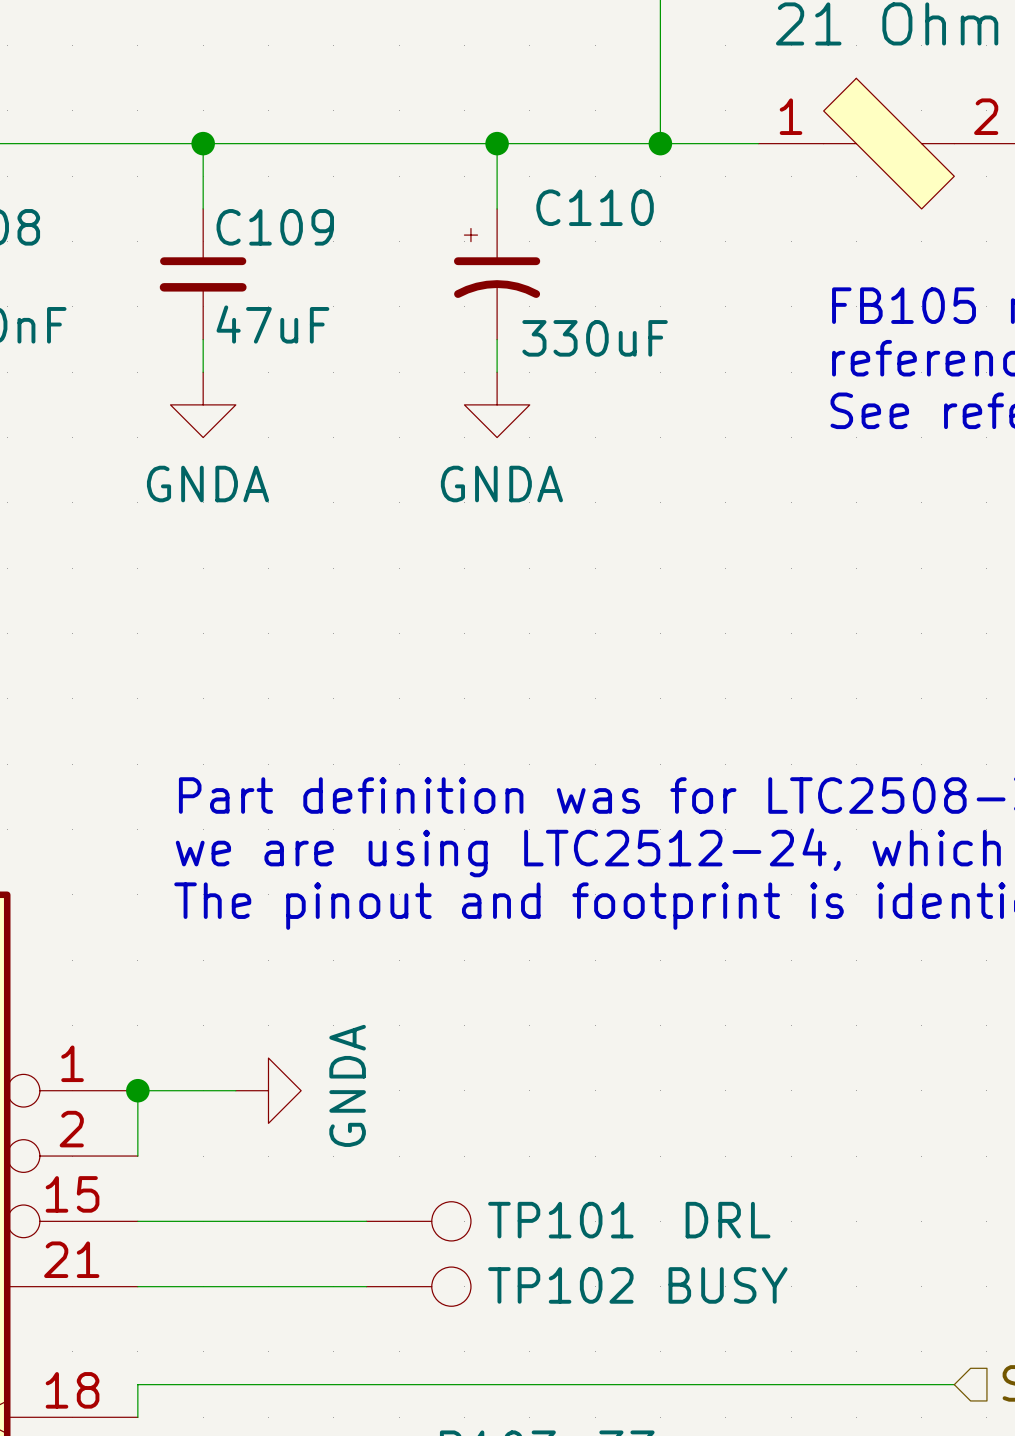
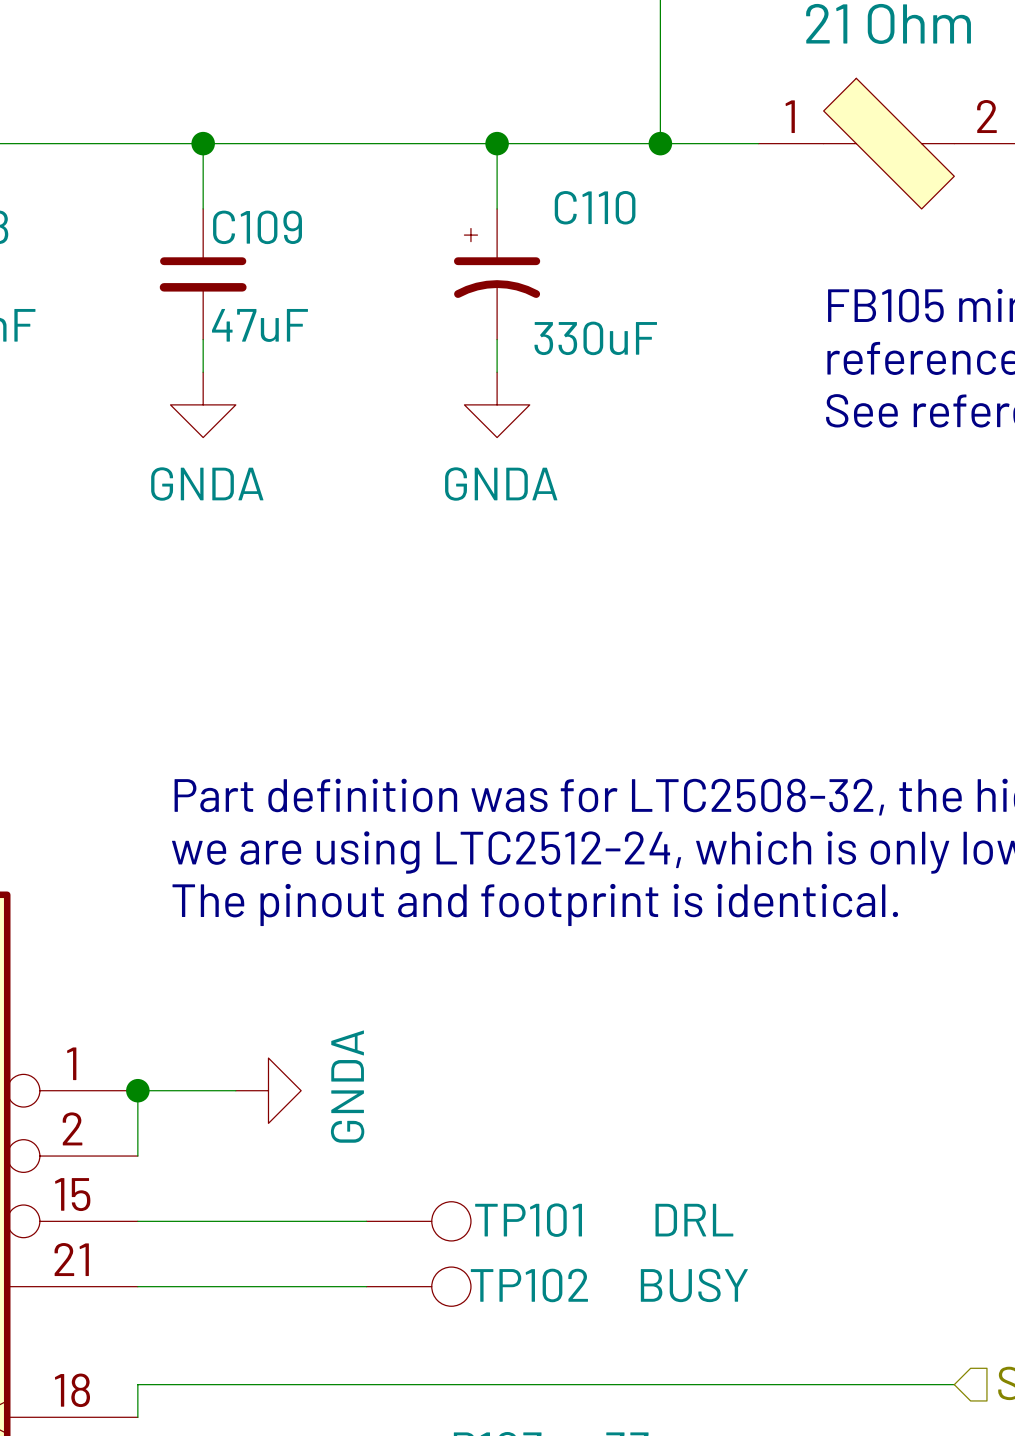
TP101 name position: TP101 (560, 1220) -> TP101 (528, 1220)
TP101 value position: DRL (728, 1220) -> DRL (694, 1220)
TP102 name position: TP102 (560, 1285) -> TP102 (529, 1285)
TP102 value position: BUSY (728, 1285) -> BUSY (694, 1285)

